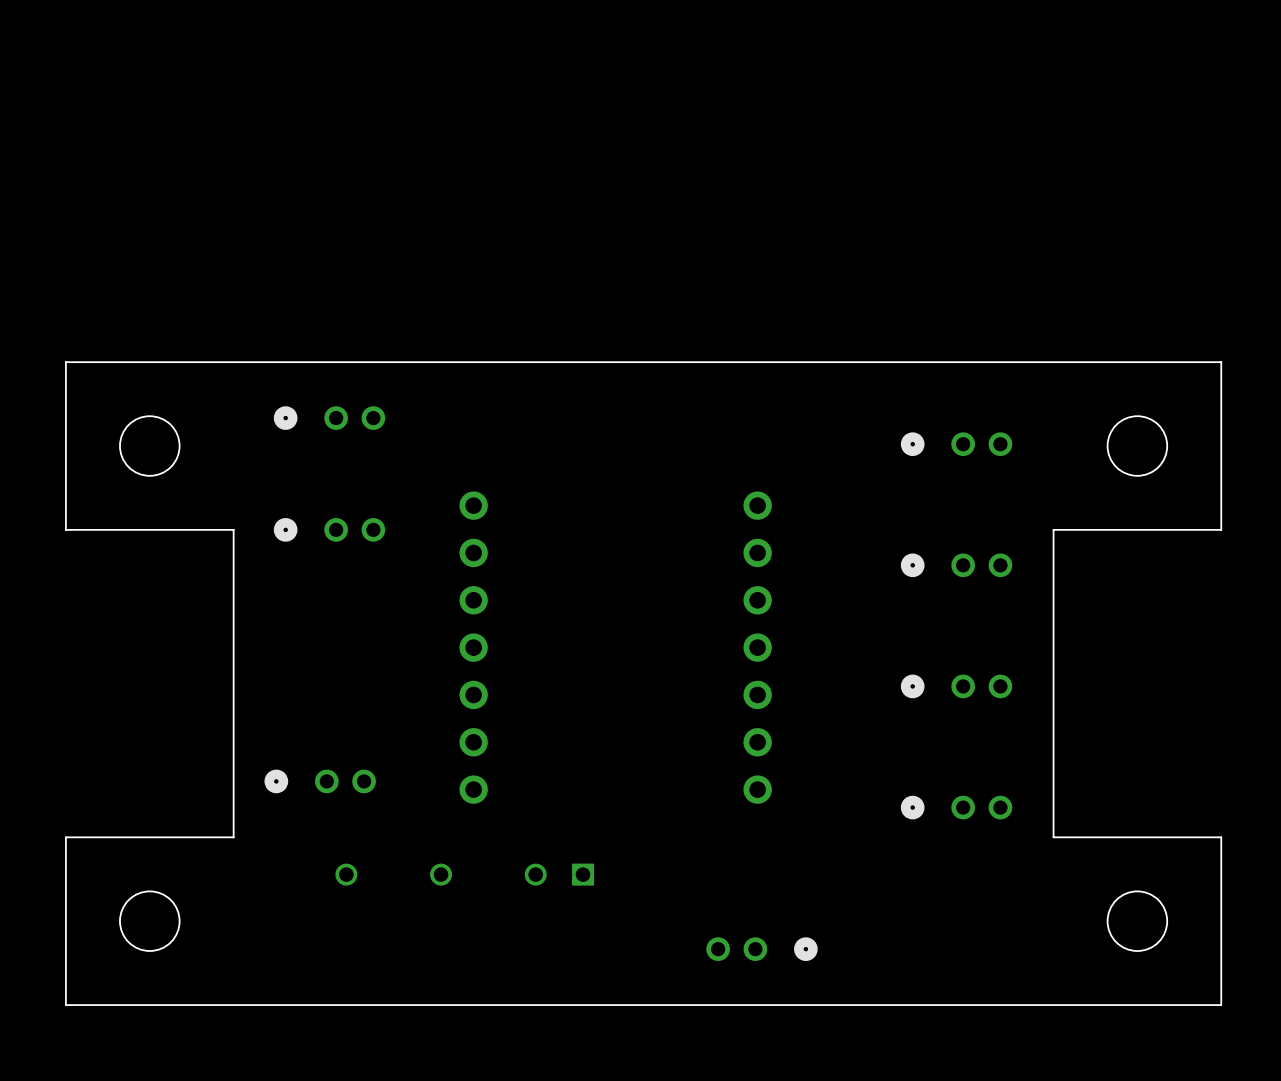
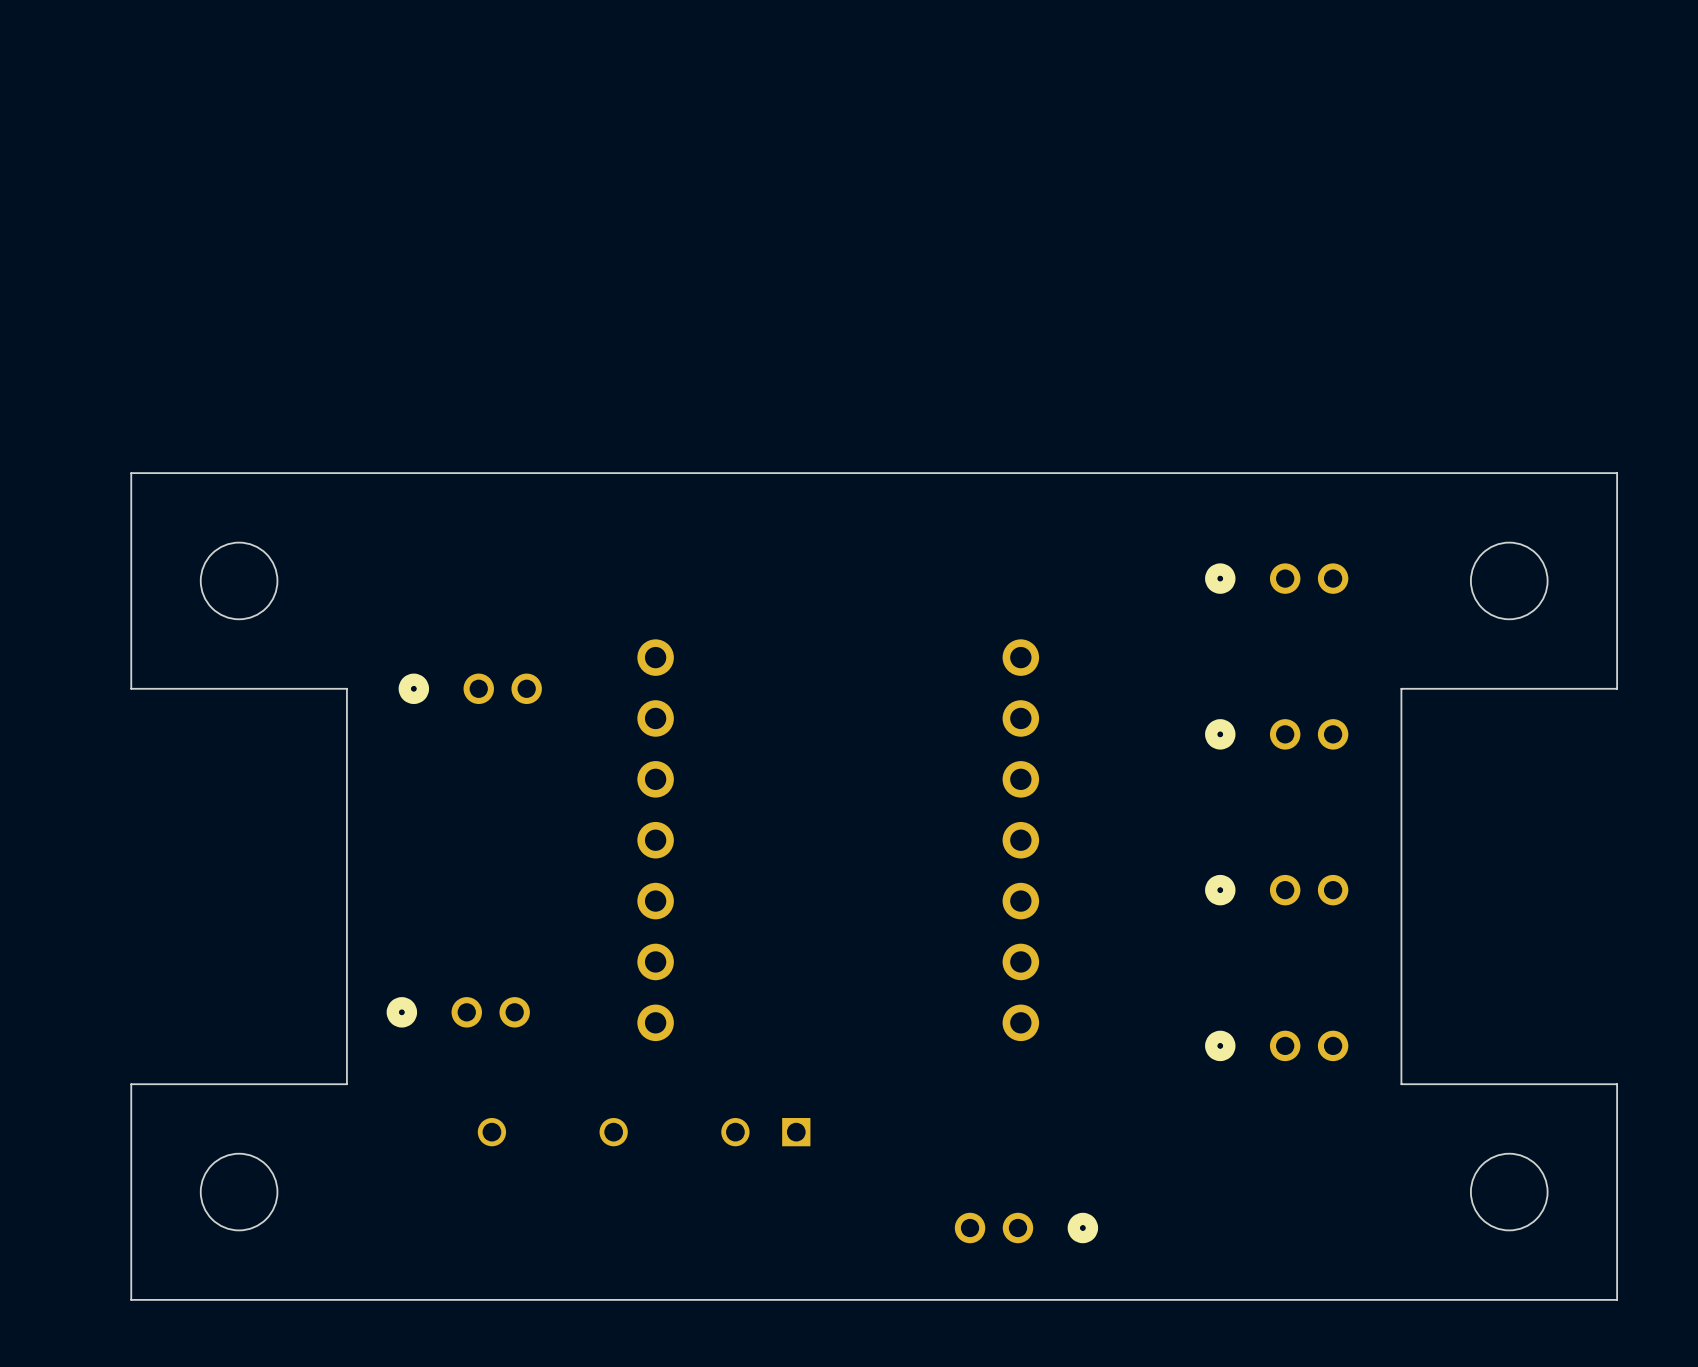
part: (329, 418) -> none

